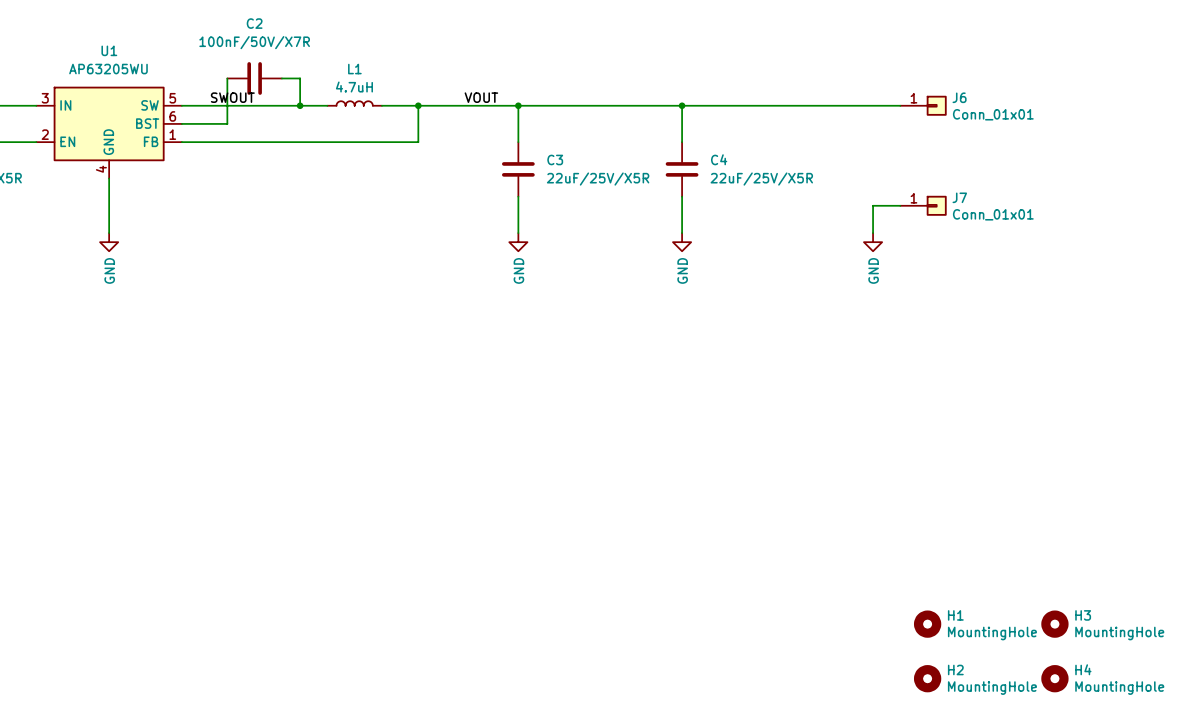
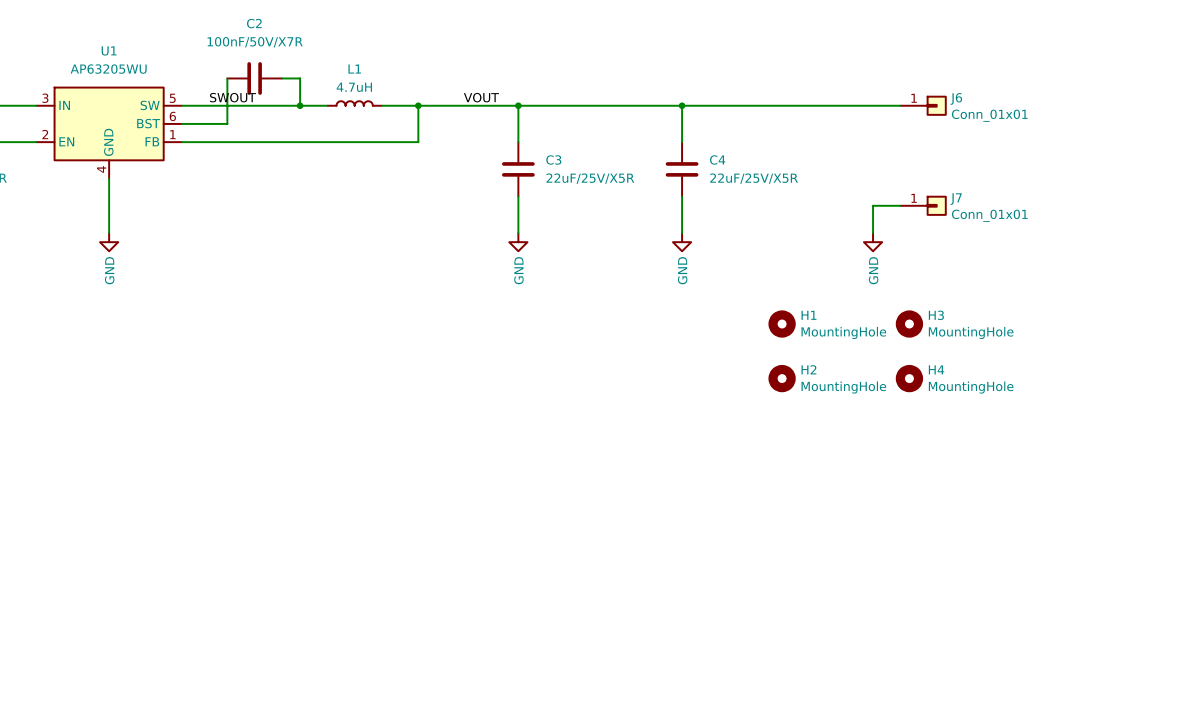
H1 position: (927, 624) -> (782, 324)
H3 position: (1054, 624) -> (909, 324)
H2 position: (927, 678) -> (782, 378)
H4 position: (1054, 678) -> (909, 378)

